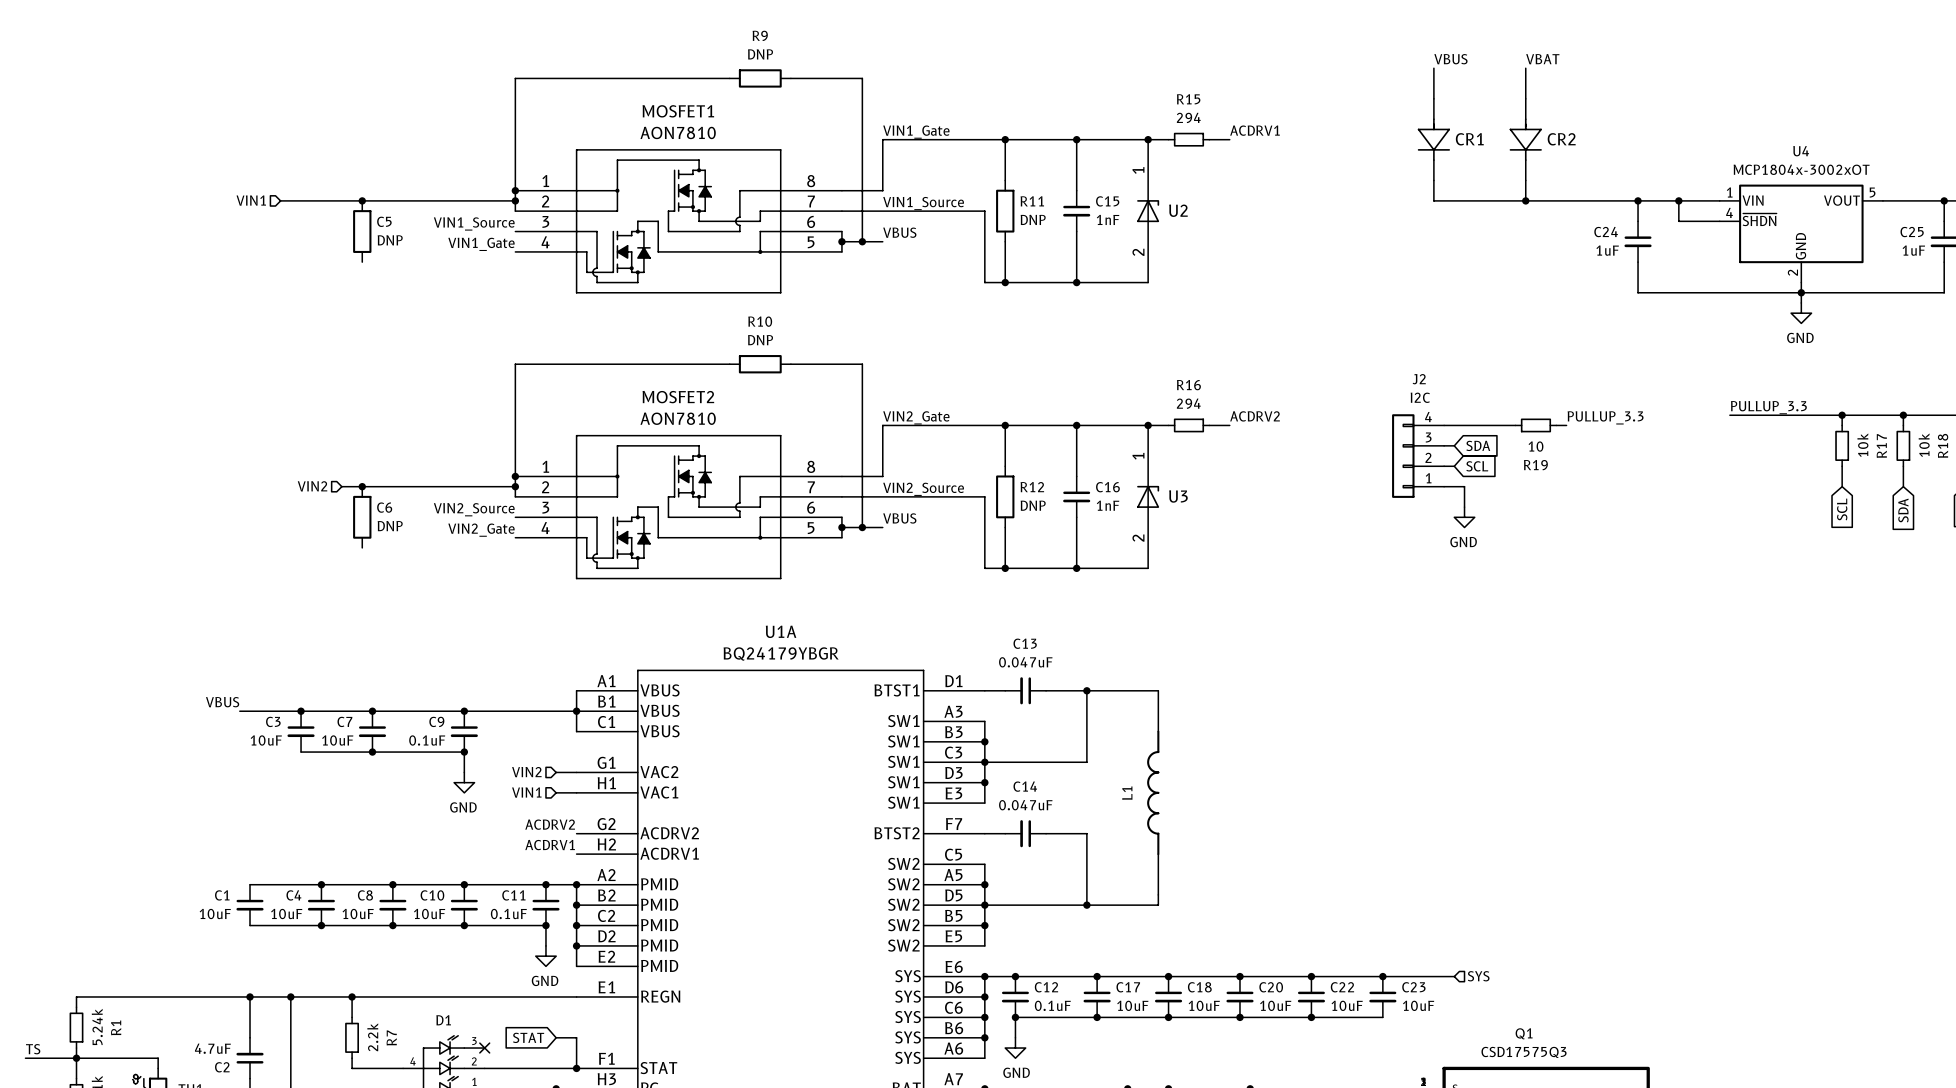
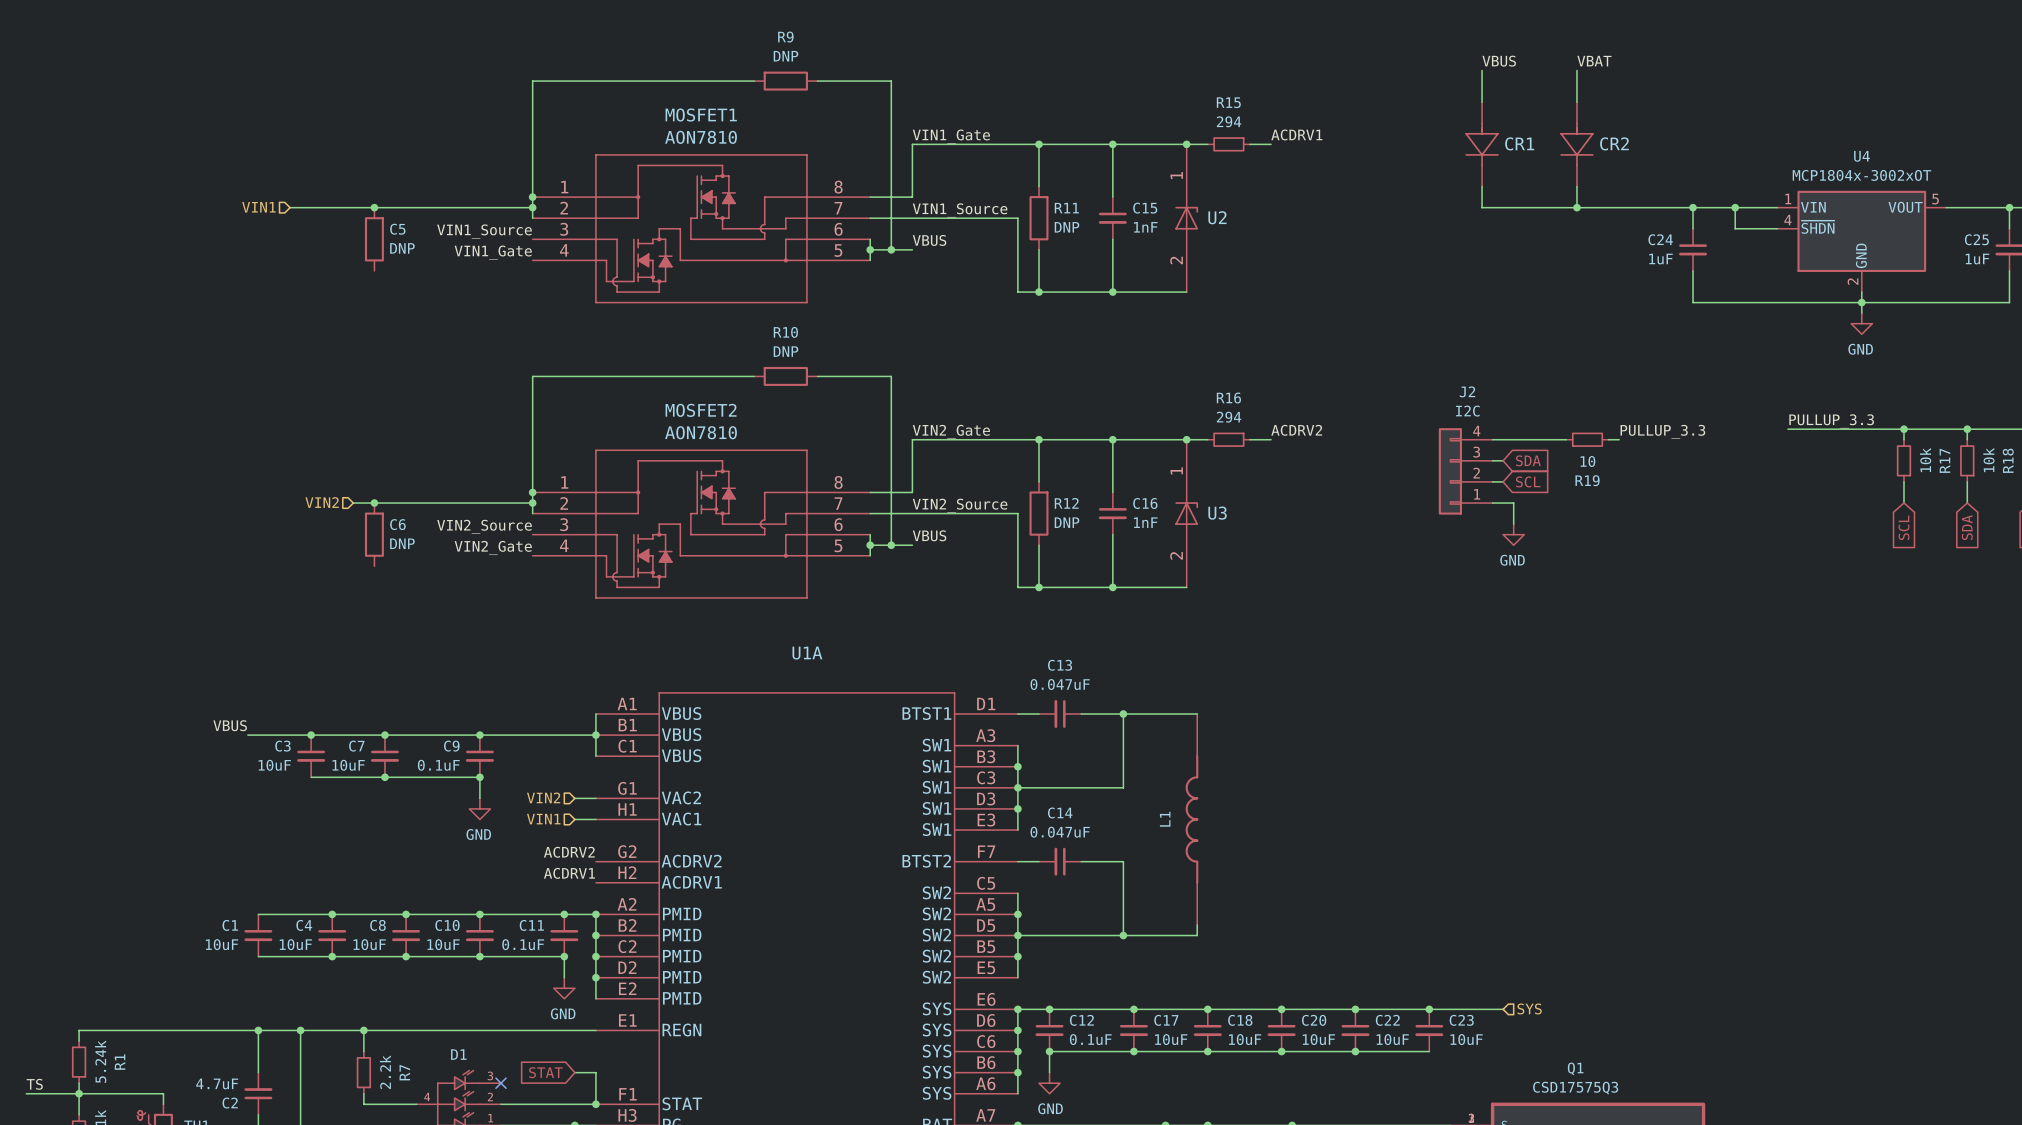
U1A value: BQ24179YBGR (781, 653) -> none

